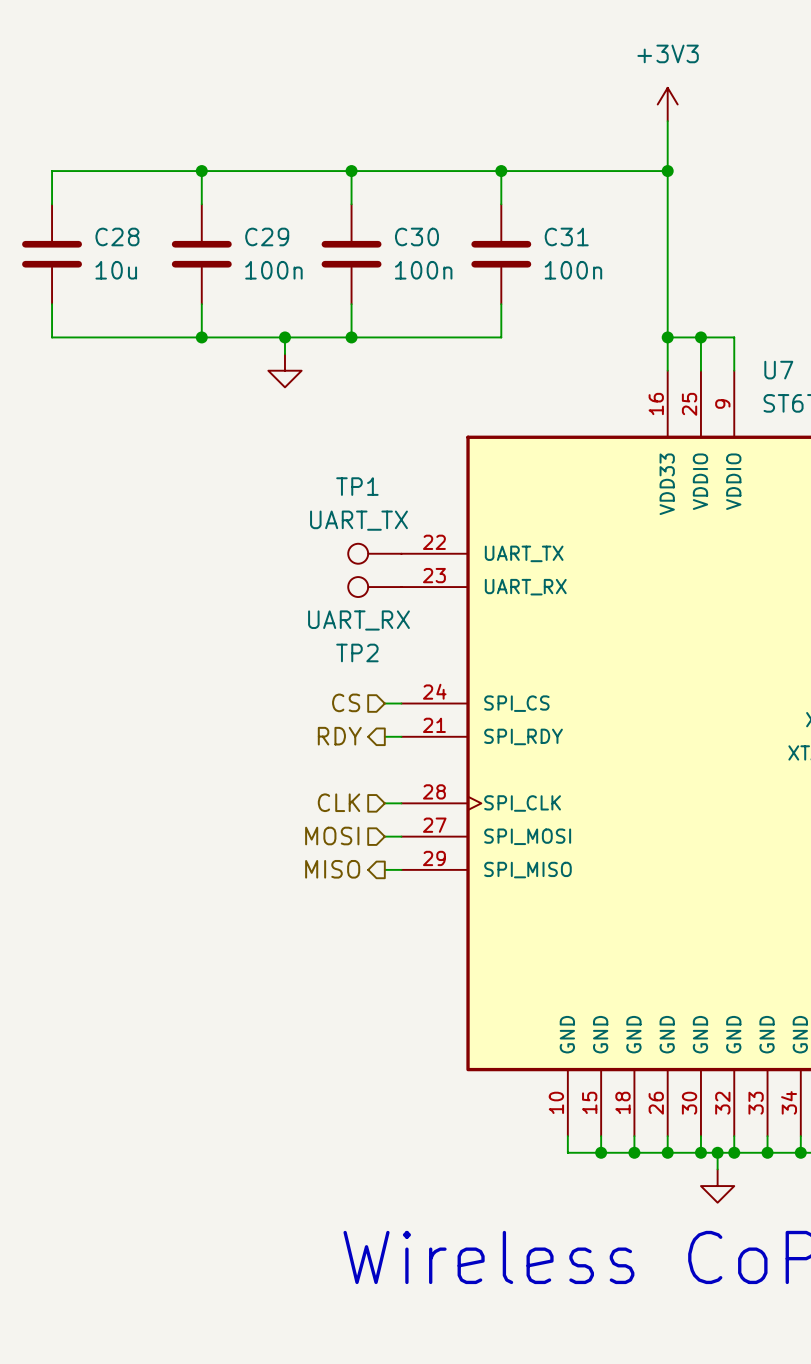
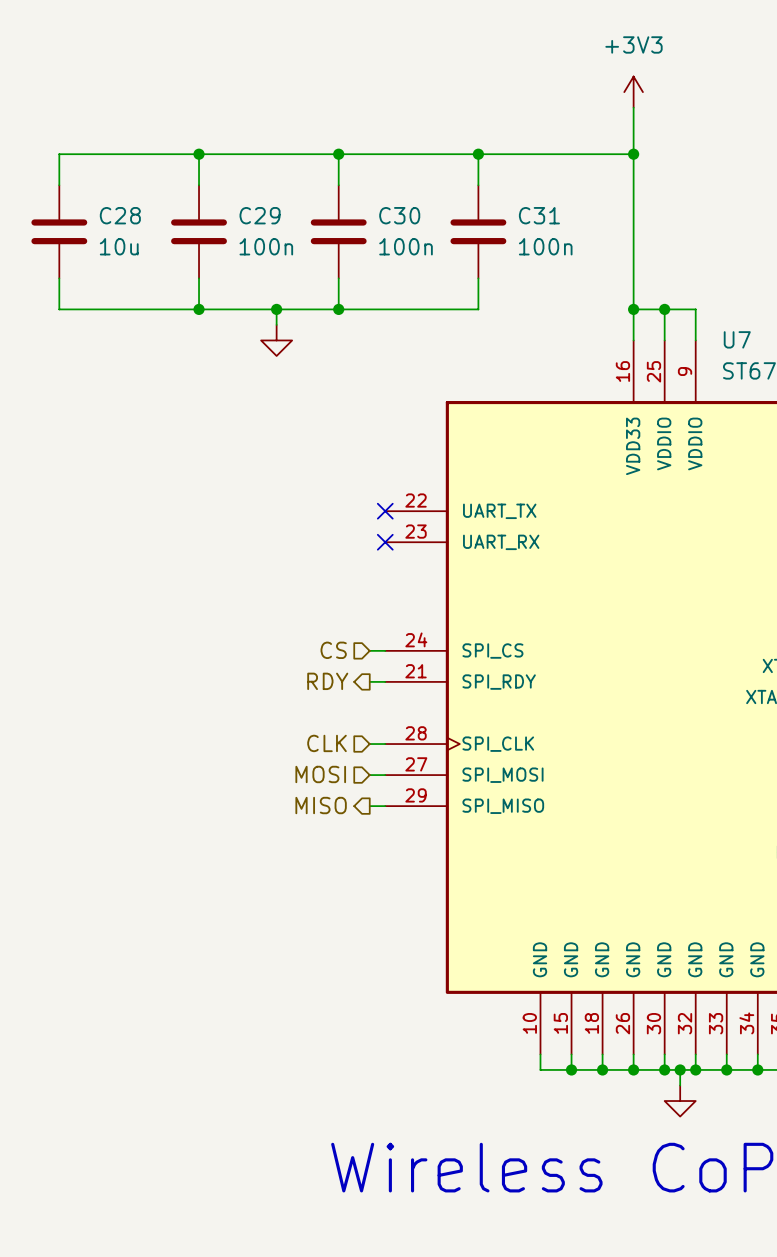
TP1: UART_TX (374, 553) -> none
no-connect mark: none -> (385, 511)
TP2: UART_RX (374, 587) -> none
no-connect mark: none -> (385, 542)

